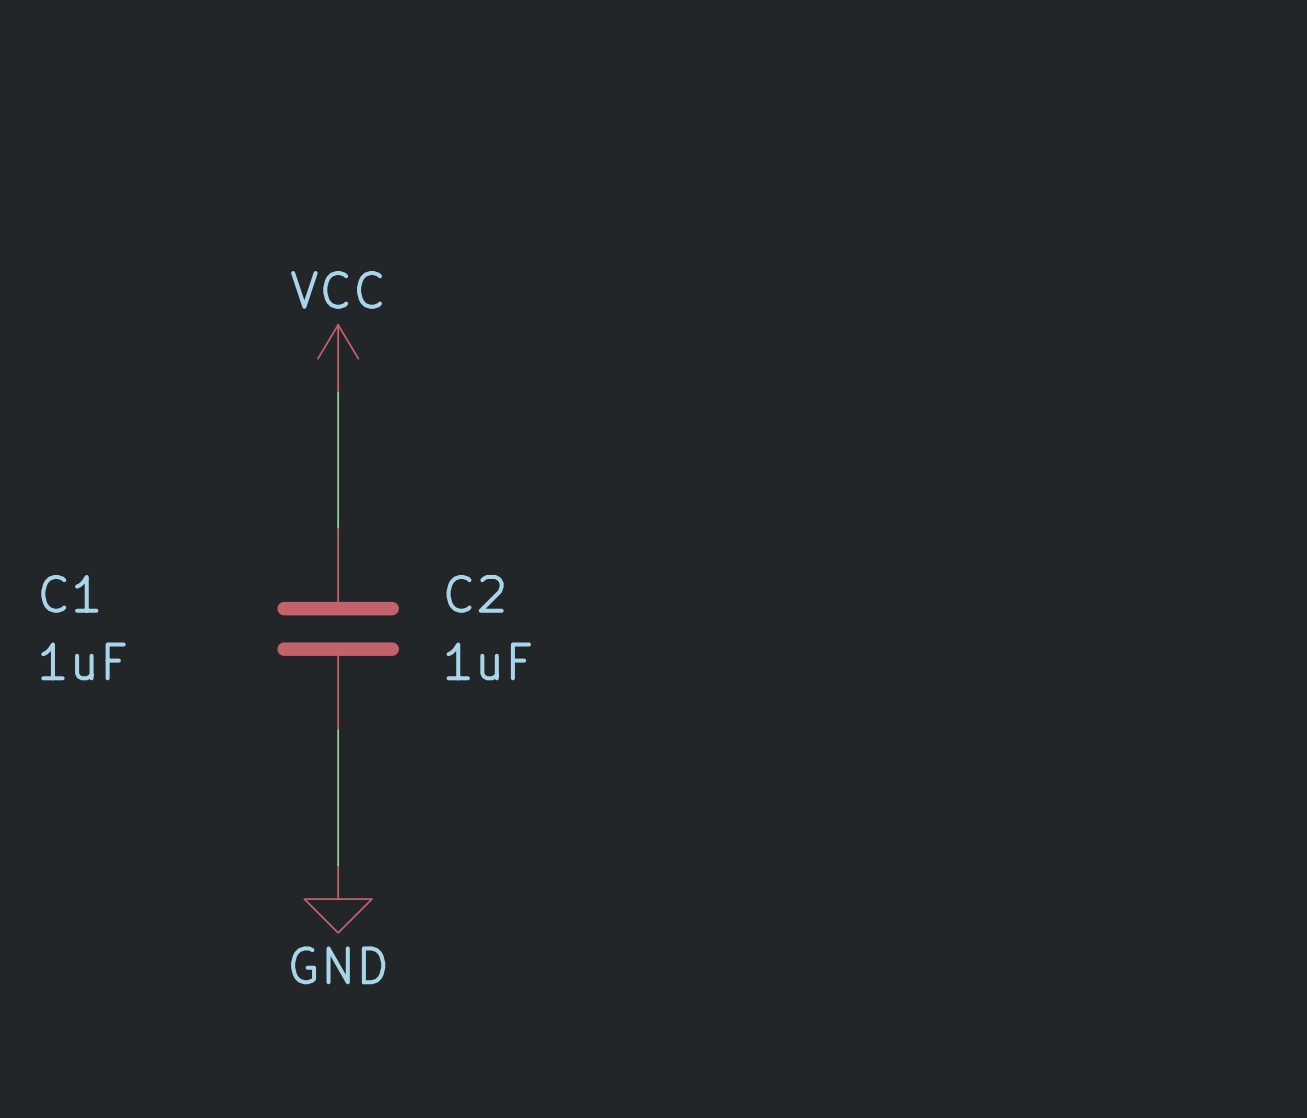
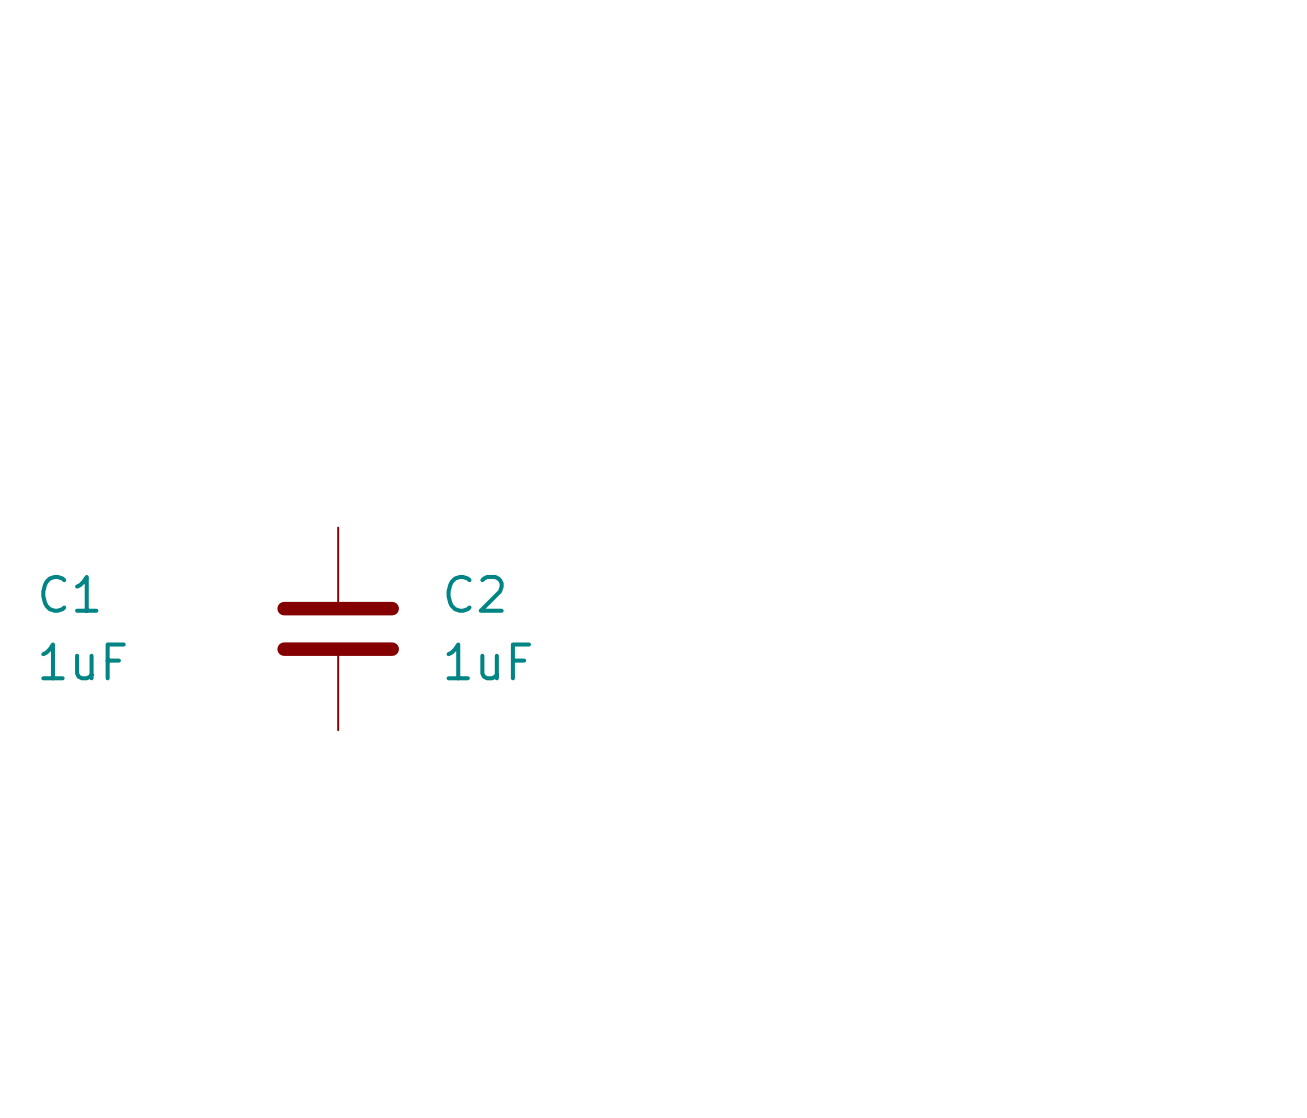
power symbol: VCC (338, 358) -> none
wire: (338, 392) (338, 527) -> none
wire: (338, 730) (338, 865) -> none
power symbol: GND (338, 899) -> none

